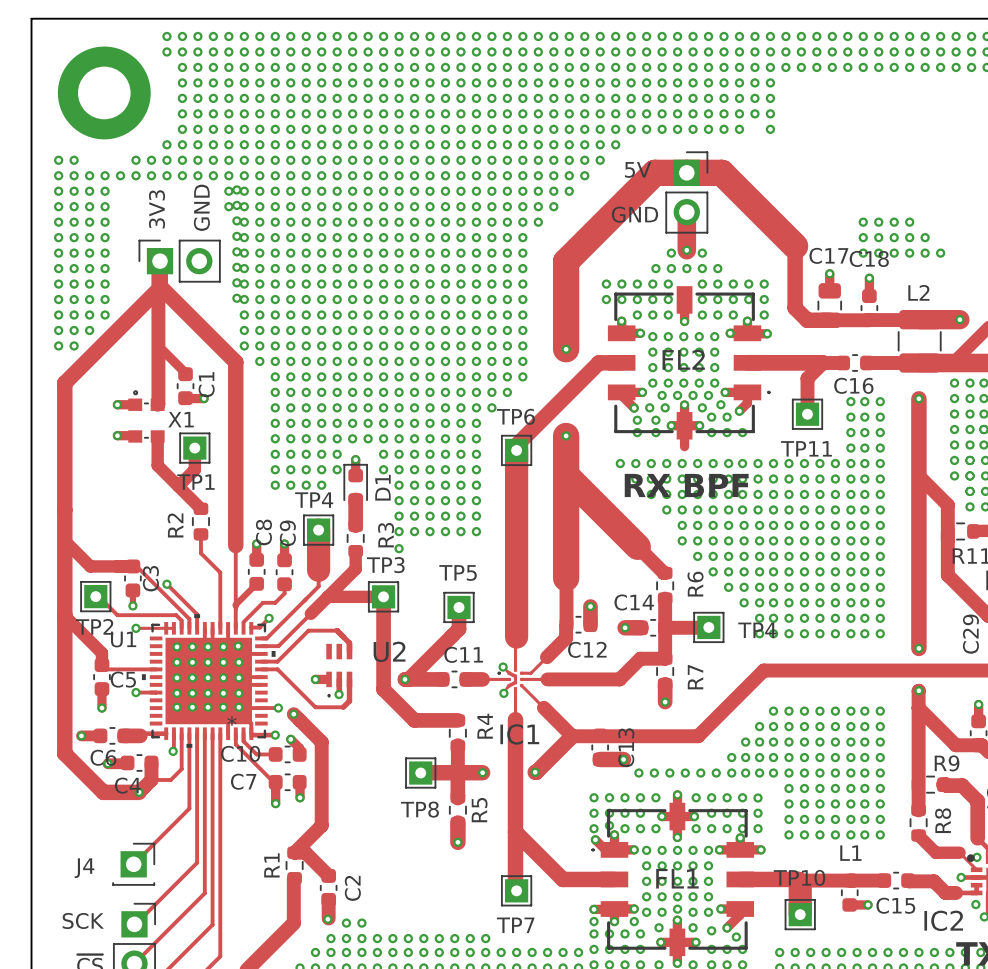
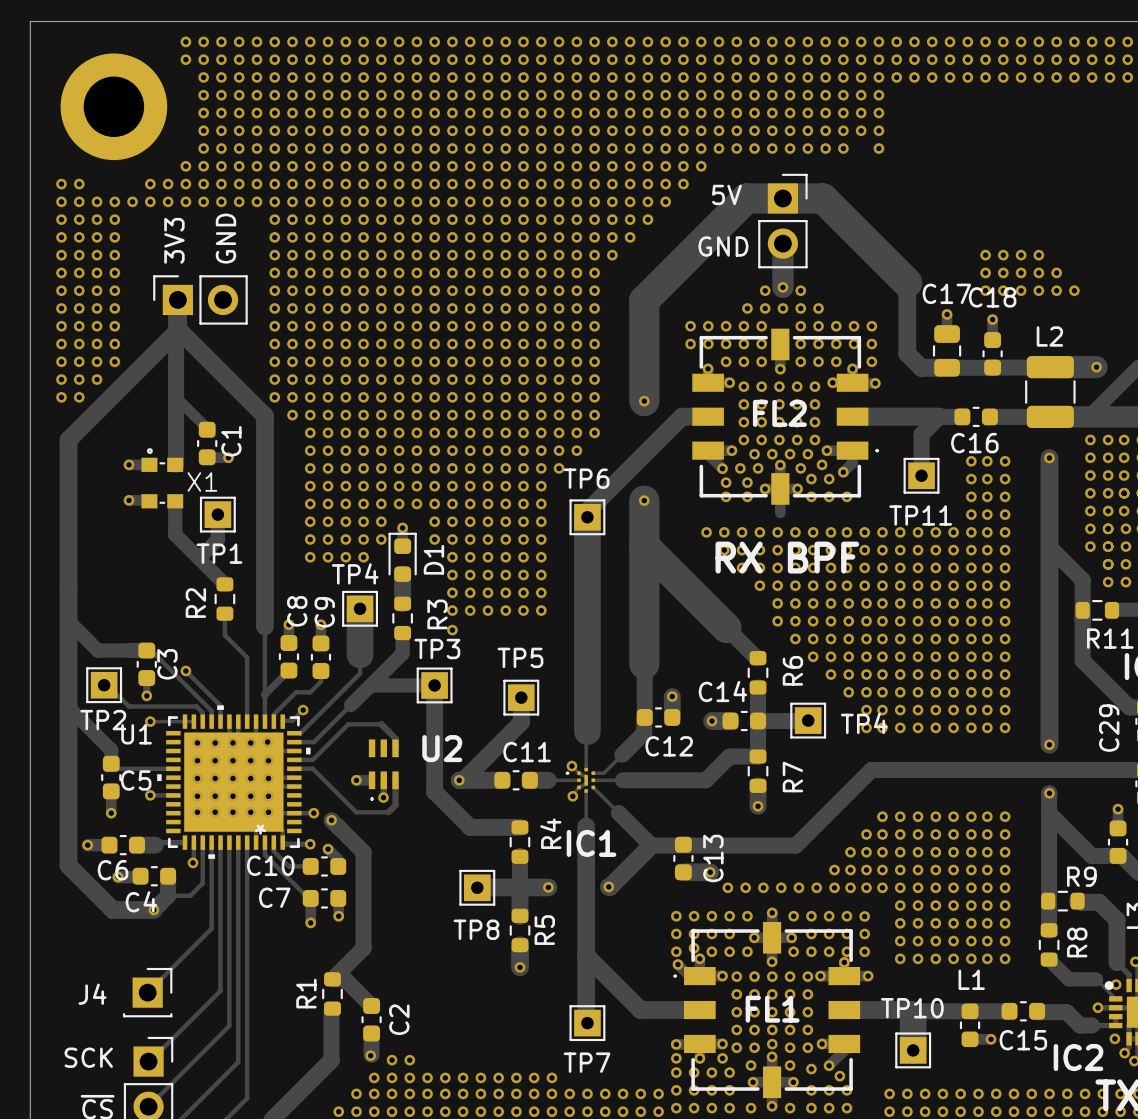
via: (236, 189) -> none
via: (228, 191) -> none
via: (236, 205) -> none
via: (228, 206) -> none
via: (236, 220) -> none
via: (236, 236) -> none
via: (236, 251) -> none
via: (236, 267) -> none
via: (236, 282) -> none
via: (236, 298) -> none

